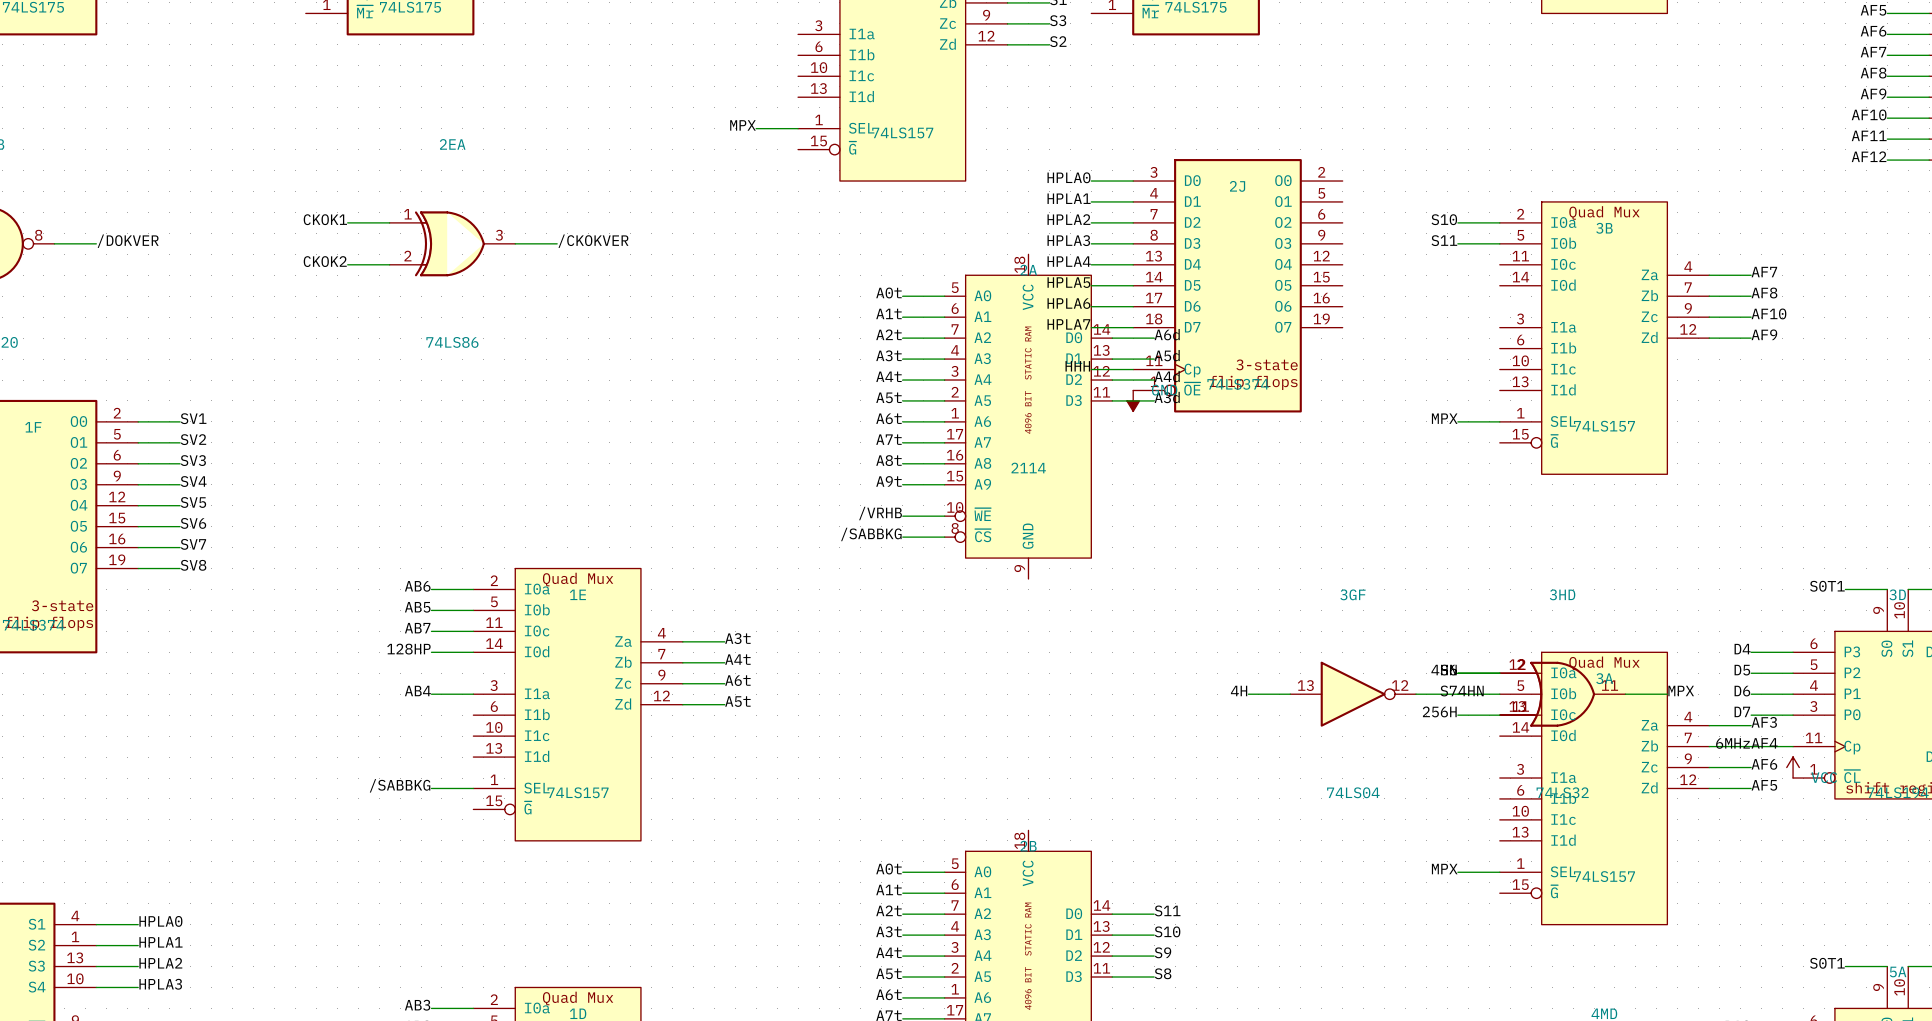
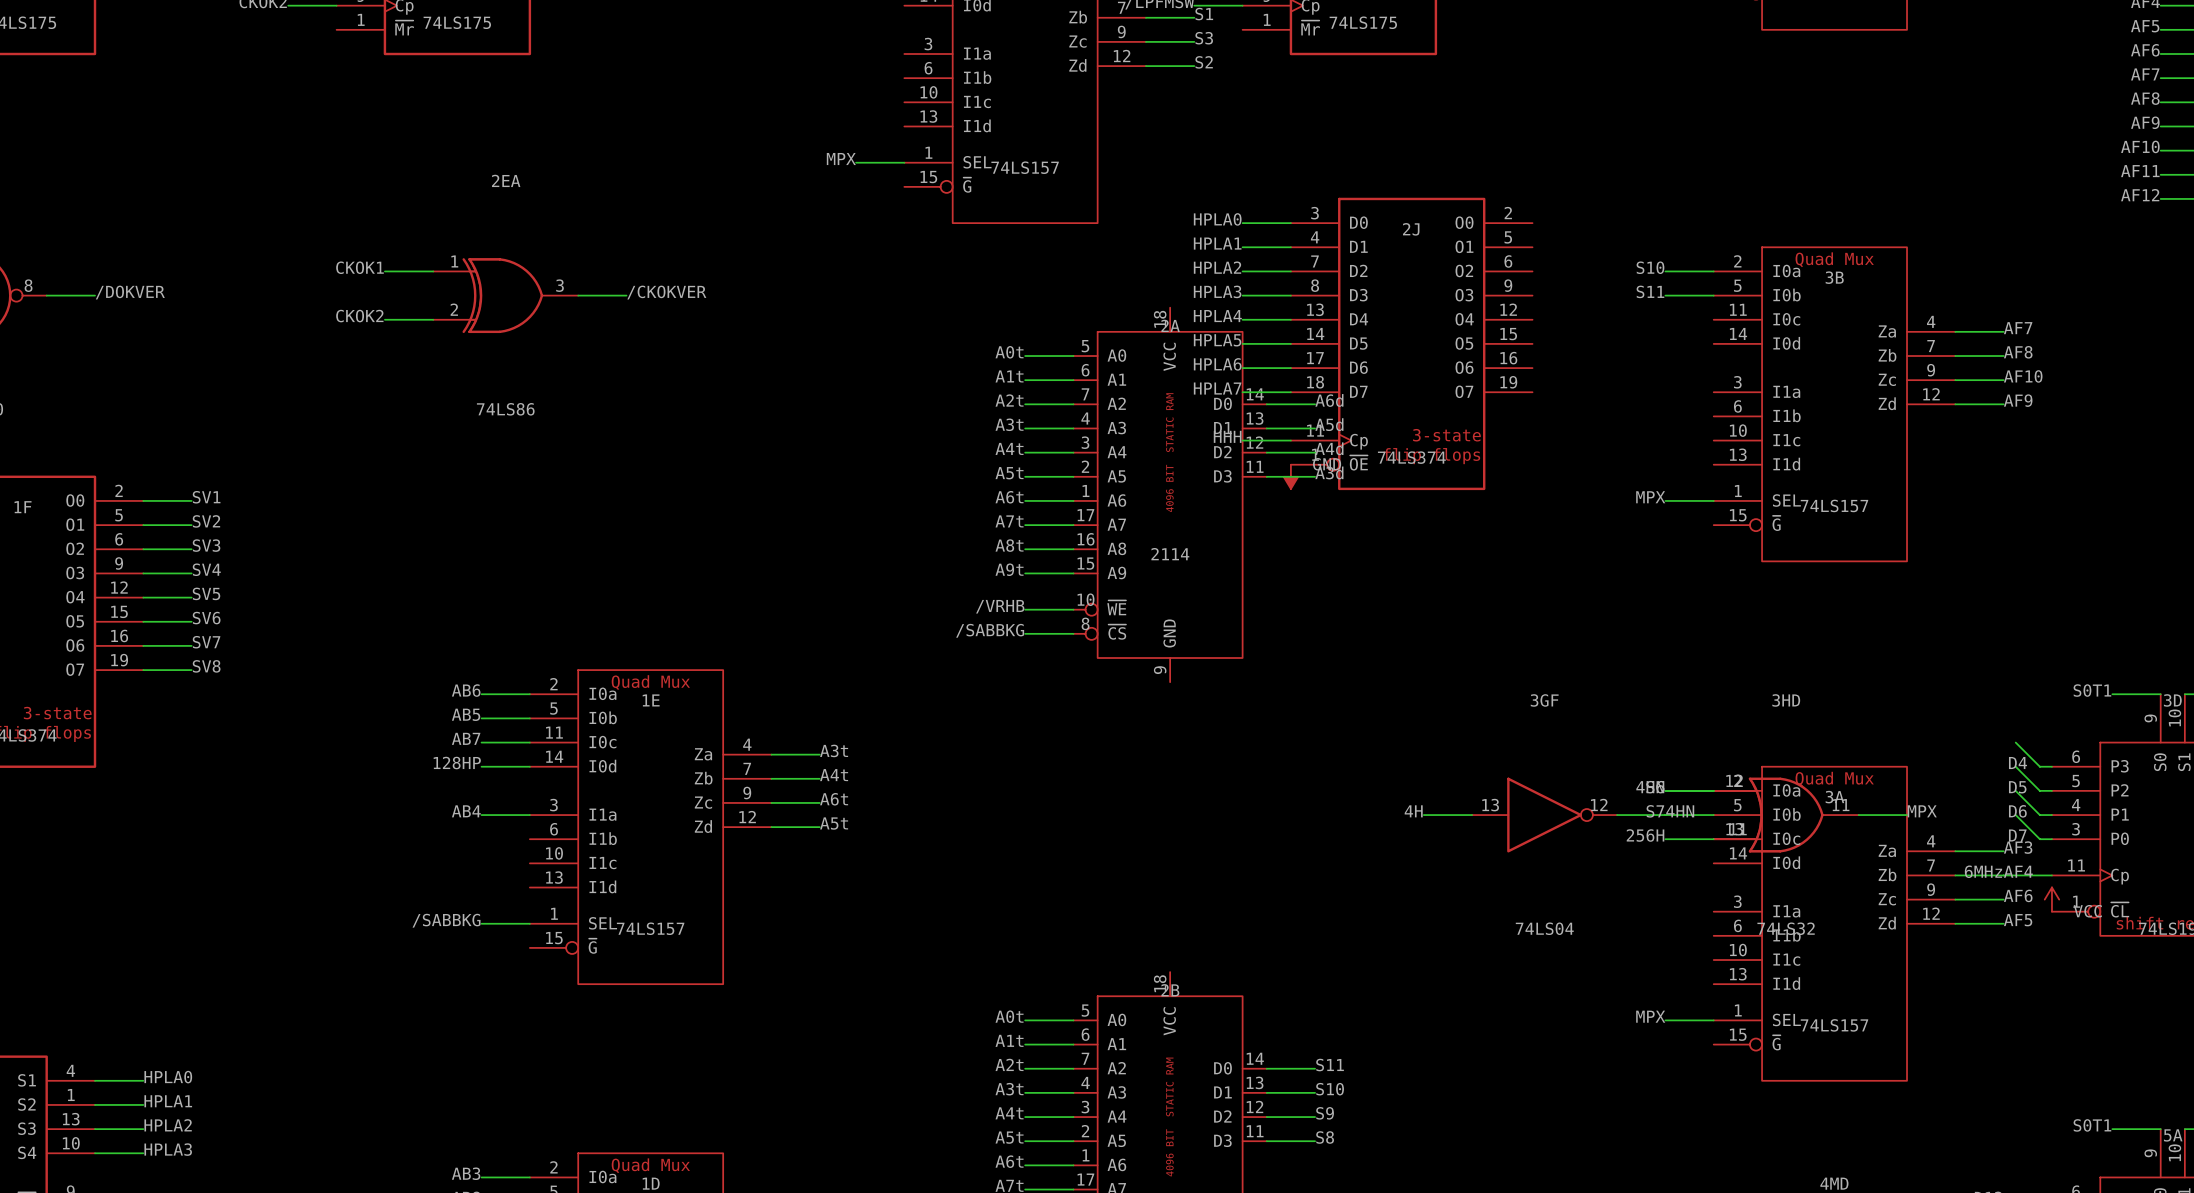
label position: D4 (1742, 649) -> D4 (2017, 763)
wire: (1751, 652) (1782, 652) -> (2015, 742) (2039, 766)
label position: D5 (1742, 670) -> D5 (2017, 787)
wire: (1751, 673) (1782, 673) -> (2015, 766) (2039, 790)
label position: D6 (1742, 691) -> D6 (2017, 811)
wire: (1751, 694) (1782, 694) -> (2015, 790) (2039, 815)
label position: D7 (1742, 711) -> D7 (2017, 835)
wire: (1751, 715) (1782, 715) -> (2015, 815) (2039, 839)

